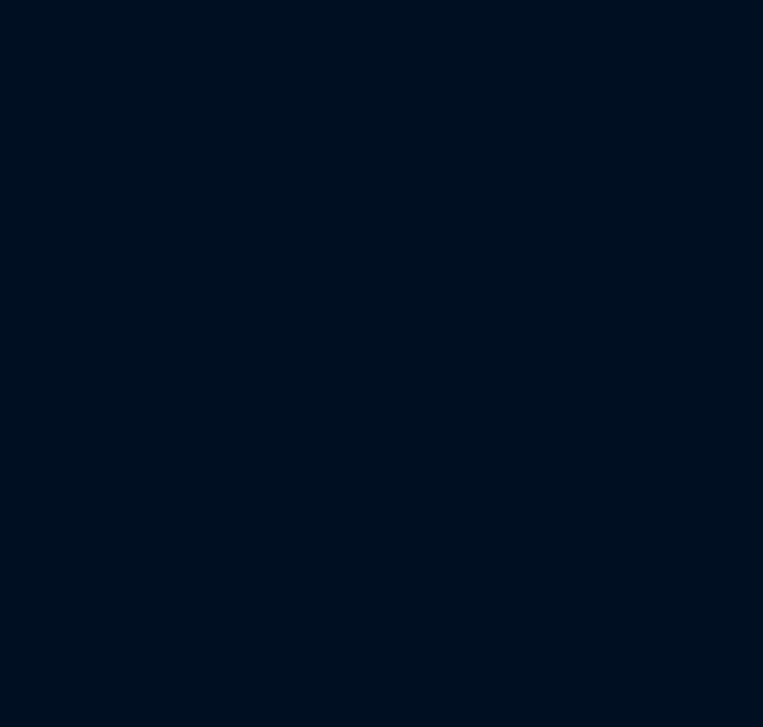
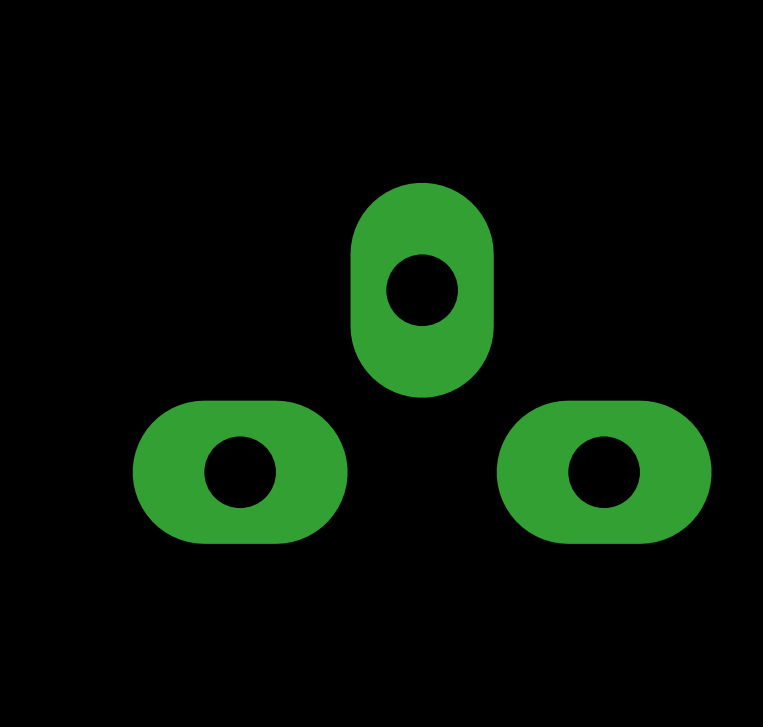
part: none -> (422, 363)

